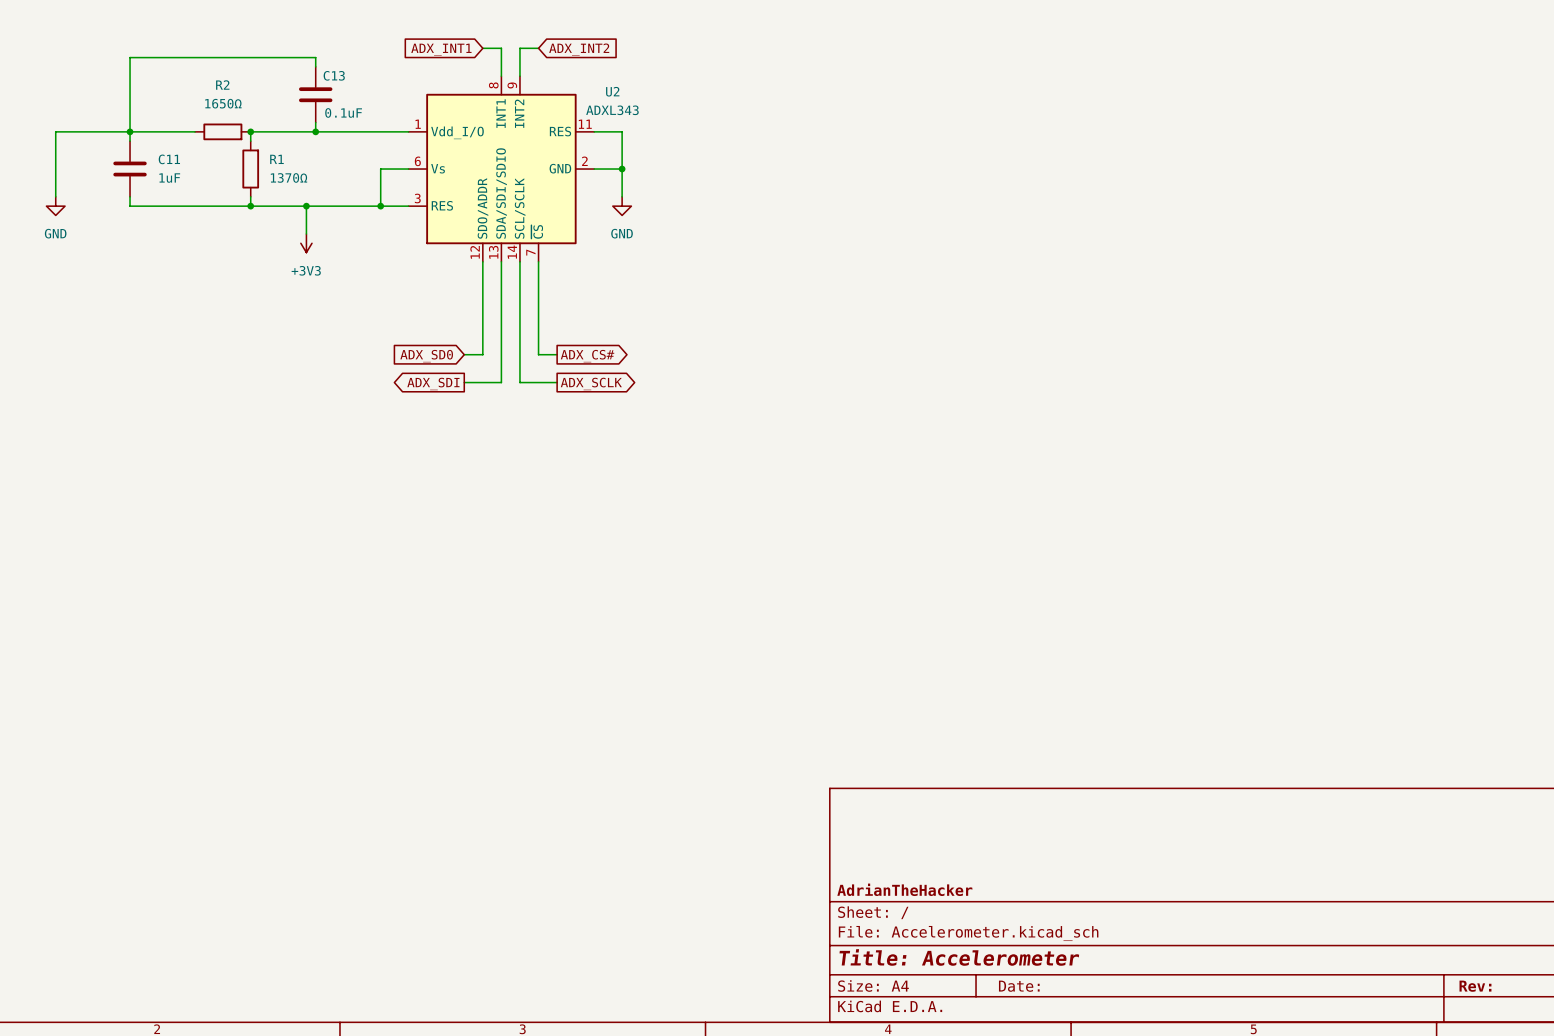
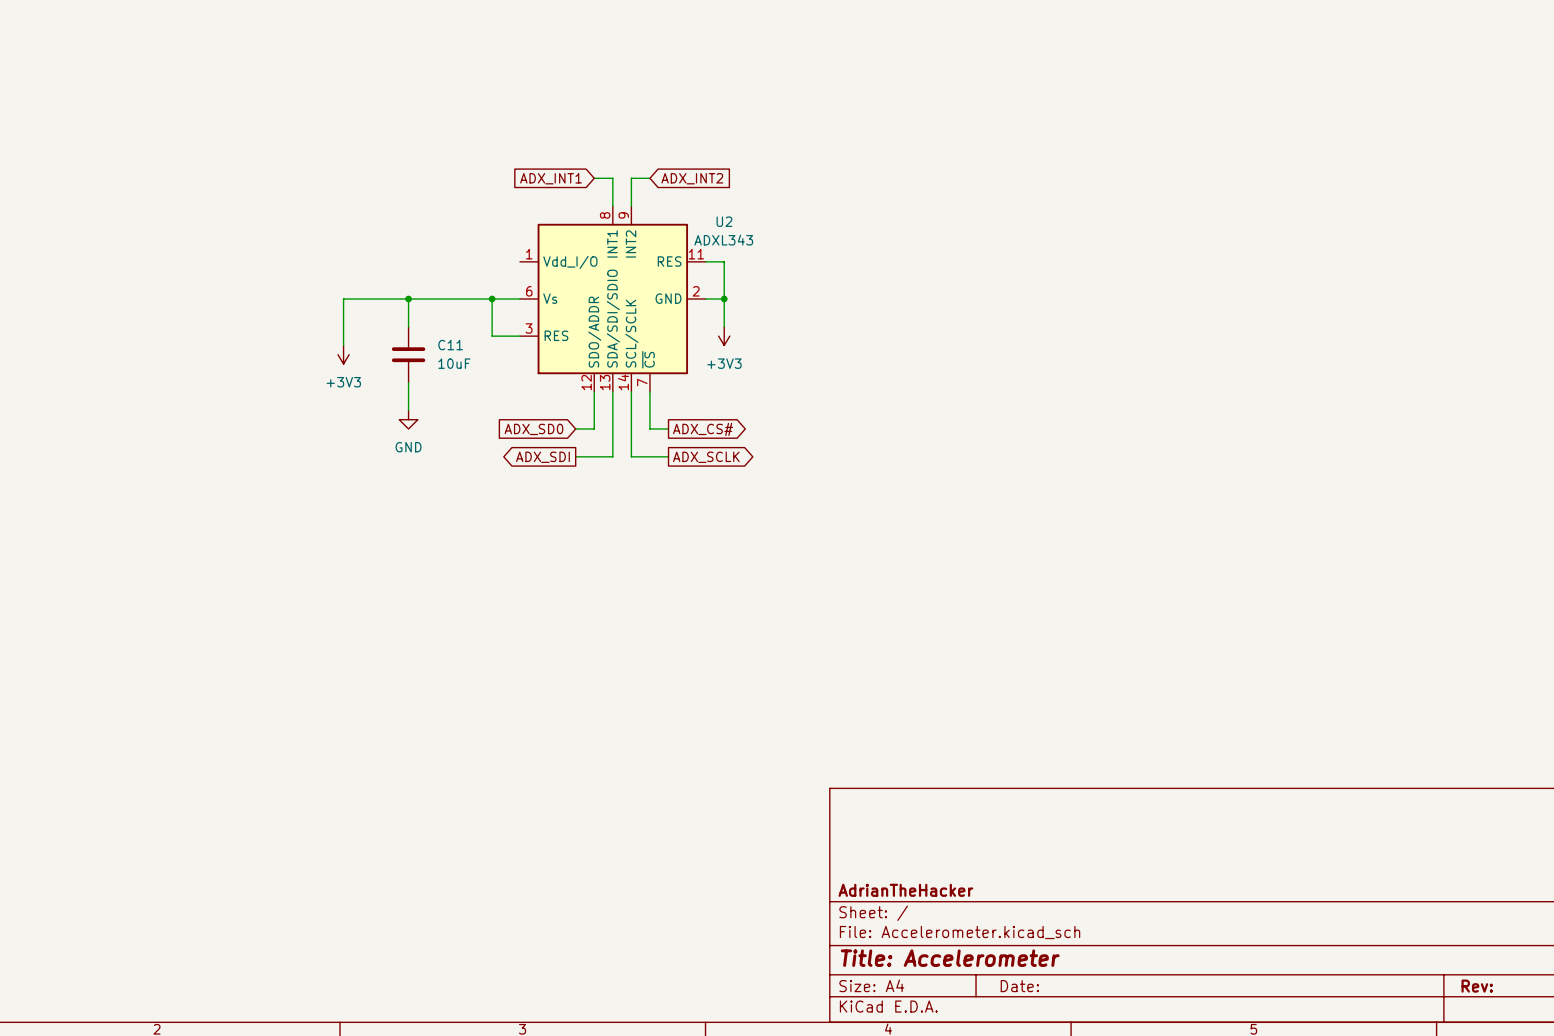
wire: (482, 48) (501, 48) (501, 76) -> (594, 178) (612, 178) (612, 206)
wire: (538, 48) (519, 48) (519, 76) -> (649, 178) (631, 178) (631, 206)
global label position: ADX_INT1 (441, 49) -> ADX_INT1 (551, 178)
global label position: ADX_INT2 (579, 49) -> ADX_INT2 (692, 178)
wire: (315, 66) (315, 57) (130, 57) (130, 141) -> none
C13: 0.1uF (315, 94) -> none
wire: (315, 122) (315, 131) -> none
junction: (130, 131) -> none
wire: (195, 131) (55, 131) (55, 196) -> none
R2: 1650Ω (222, 131) -> none
junction: (250, 131) -> none
junction: (315, 131) -> none
wire: (408, 131) (250, 131) (250, 141) -> none
wire: (594, 131) (622, 131) (622, 196) -> none
C11 position: (130, 169) -> (408, 354)
R1: 1370Ω (250, 169) -> none
wire: (408, 169) (380, 169) (380, 206) -> none
U2 position: (501, 169) -> (612, 299)
wire: (594, 169) (622, 169) -> none
junction: (622, 169) -> none
C11 value: 1uF (169, 178) -> 10uF (454, 363)
wire: (130, 196) (130, 206) (408, 206) -> none
wire: (250, 196) (250, 206) -> none
power symbol: GND (55, 206) -> none
junction: (250, 206) -> none
wire: (306, 206) (306, 234) -> (408, 299) (408, 326)
junction: (306, 206) -> none
junction: (380, 206) -> none
power symbol: GND (622, 206) -> none
power symbol position: +3V3 (306, 243) -> +3V3 (343, 354)
wire: (482, 261) (482, 354) (464, 354) -> none
wire: (501, 261) (501, 382) (464, 382) -> none
wire: (519, 261) (519, 382) (557, 382) -> none
wire: none -> (705, 261) (724, 261) (724, 326)
junction: none -> (408, 299)
wire: none -> (492, 299) (492, 336) (519, 336)
junction: none -> (492, 299)
wire: none -> (519, 299) (343, 299) (343, 345)
wire: none -> (705, 299) (724, 299)
junction: none -> (724, 299)
power symbol: none -> +3V3 (724, 336)
global label position: ADX_SD0 (426, 356) -> ADX_SD0 (534, 429)
global label position: ADX_CS# (587, 356) -> ADX_CS# (703, 429)
wire: none -> (408, 382) (408, 410)
global label position: ADX_SDI (433, 383) -> ADX_SDI (542, 457)
global label position: ADX_SCLK (591, 383) -> ADX_SCLK (706, 457)
wire: none -> (594, 391) (594, 428) (575, 428)
wire: none -> (612, 391) (612, 456) (575, 456)
wire: none -> (631, 391) (631, 456) (668, 456)
wire: none -> (649, 391) (649, 428) (668, 428)
power symbol: none -> GND (408, 419)

